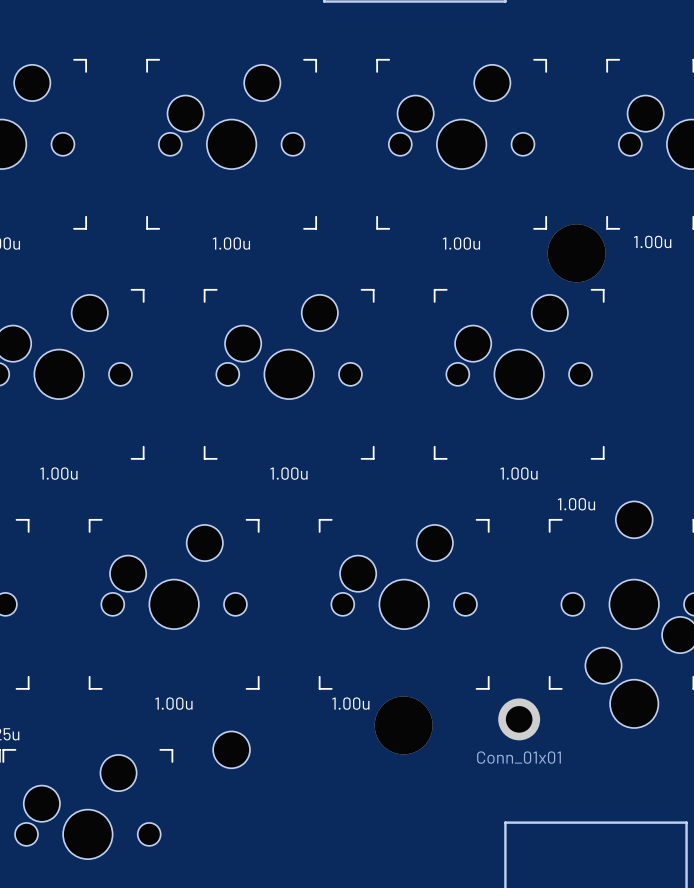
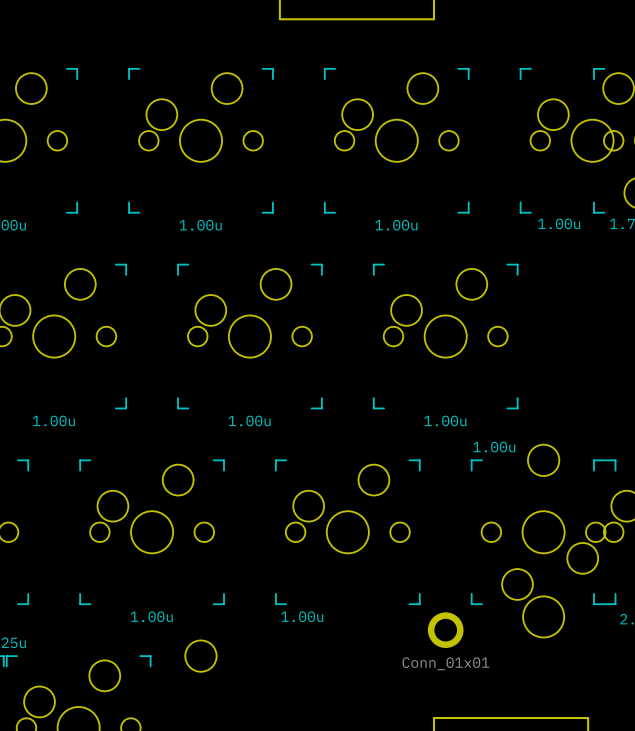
part: (576, 253) -> none
part: (403, 725) -> none

